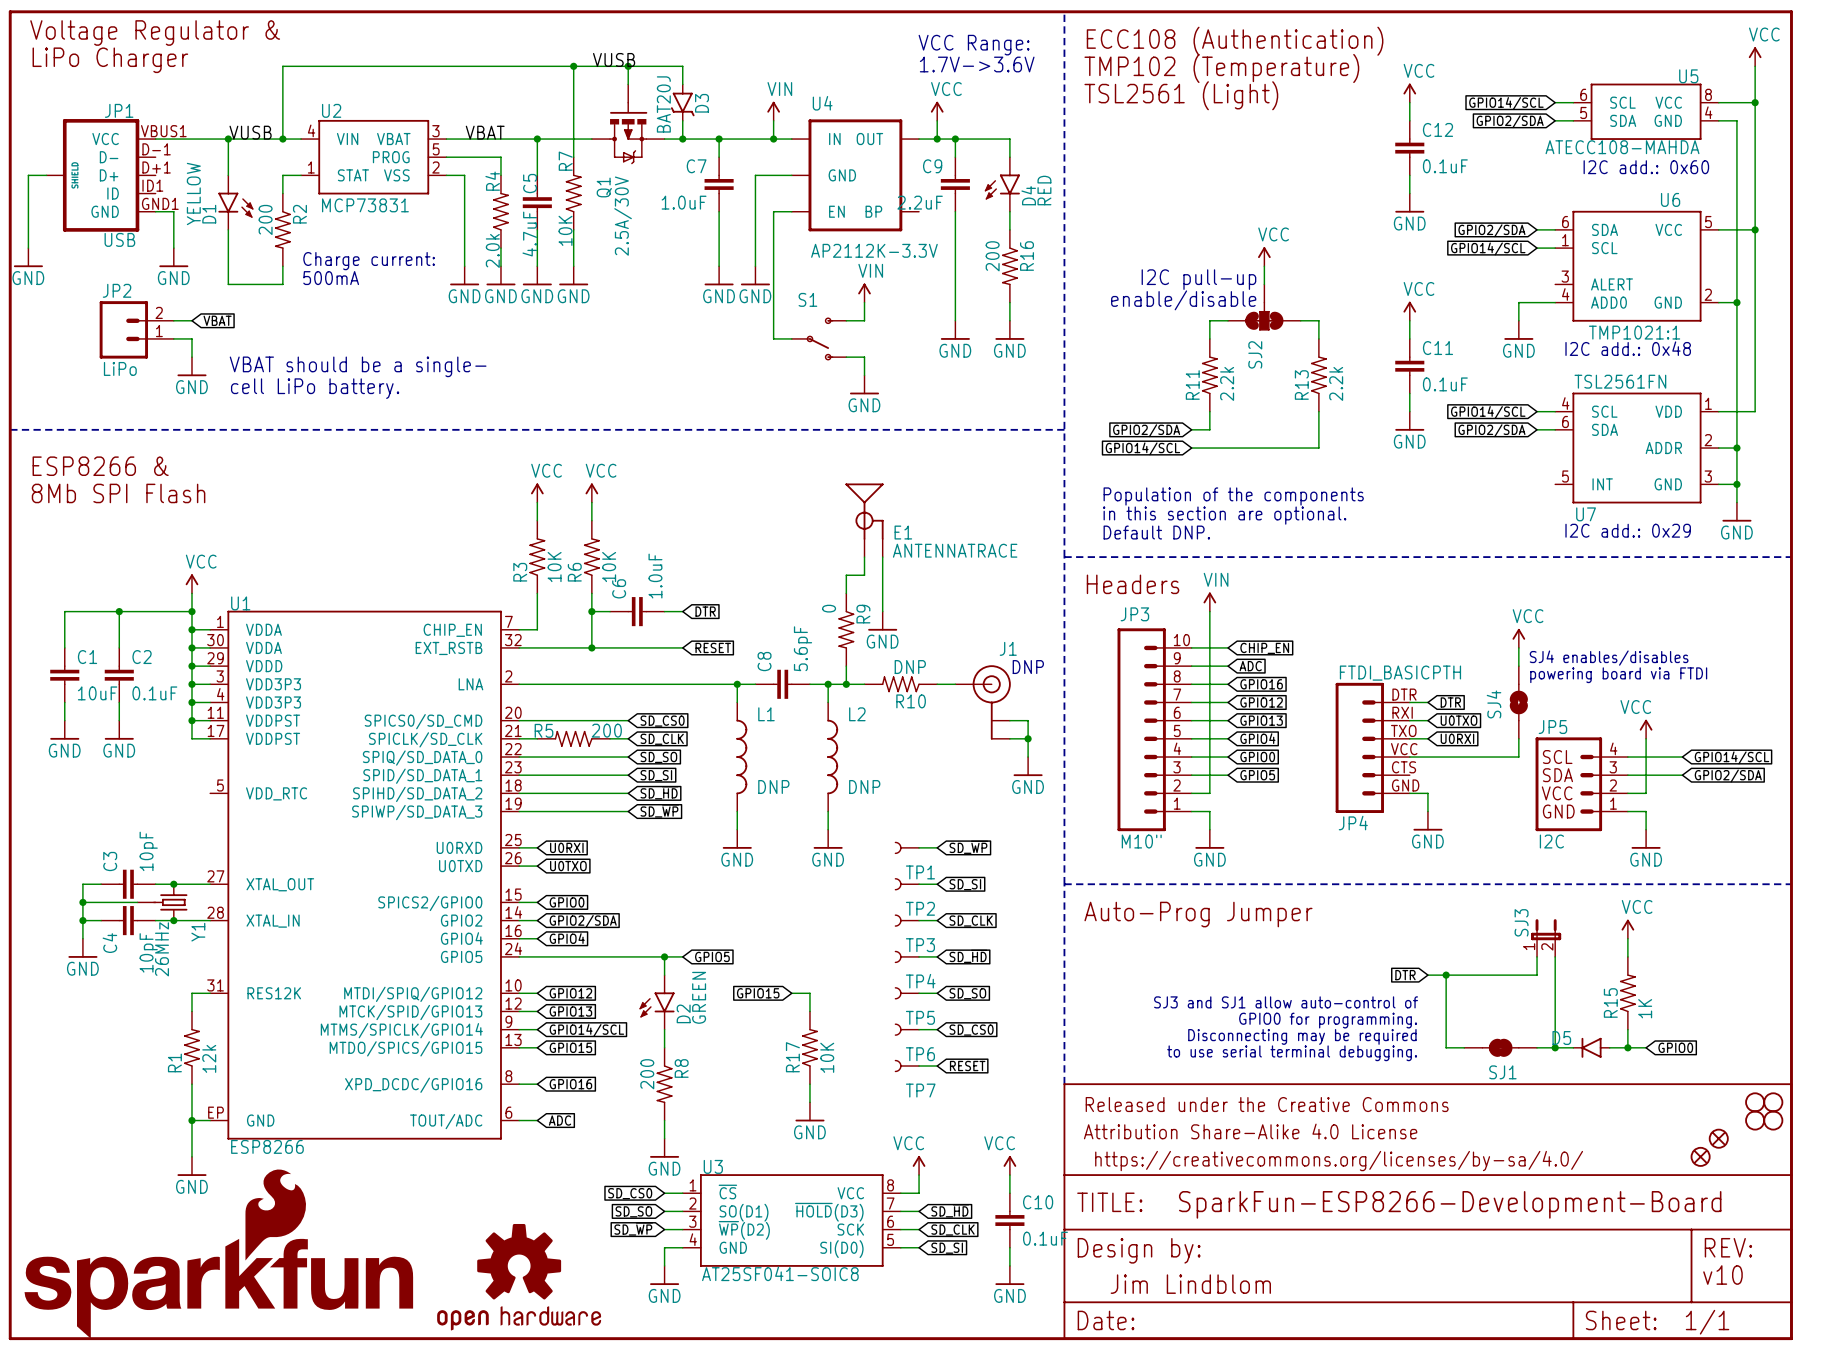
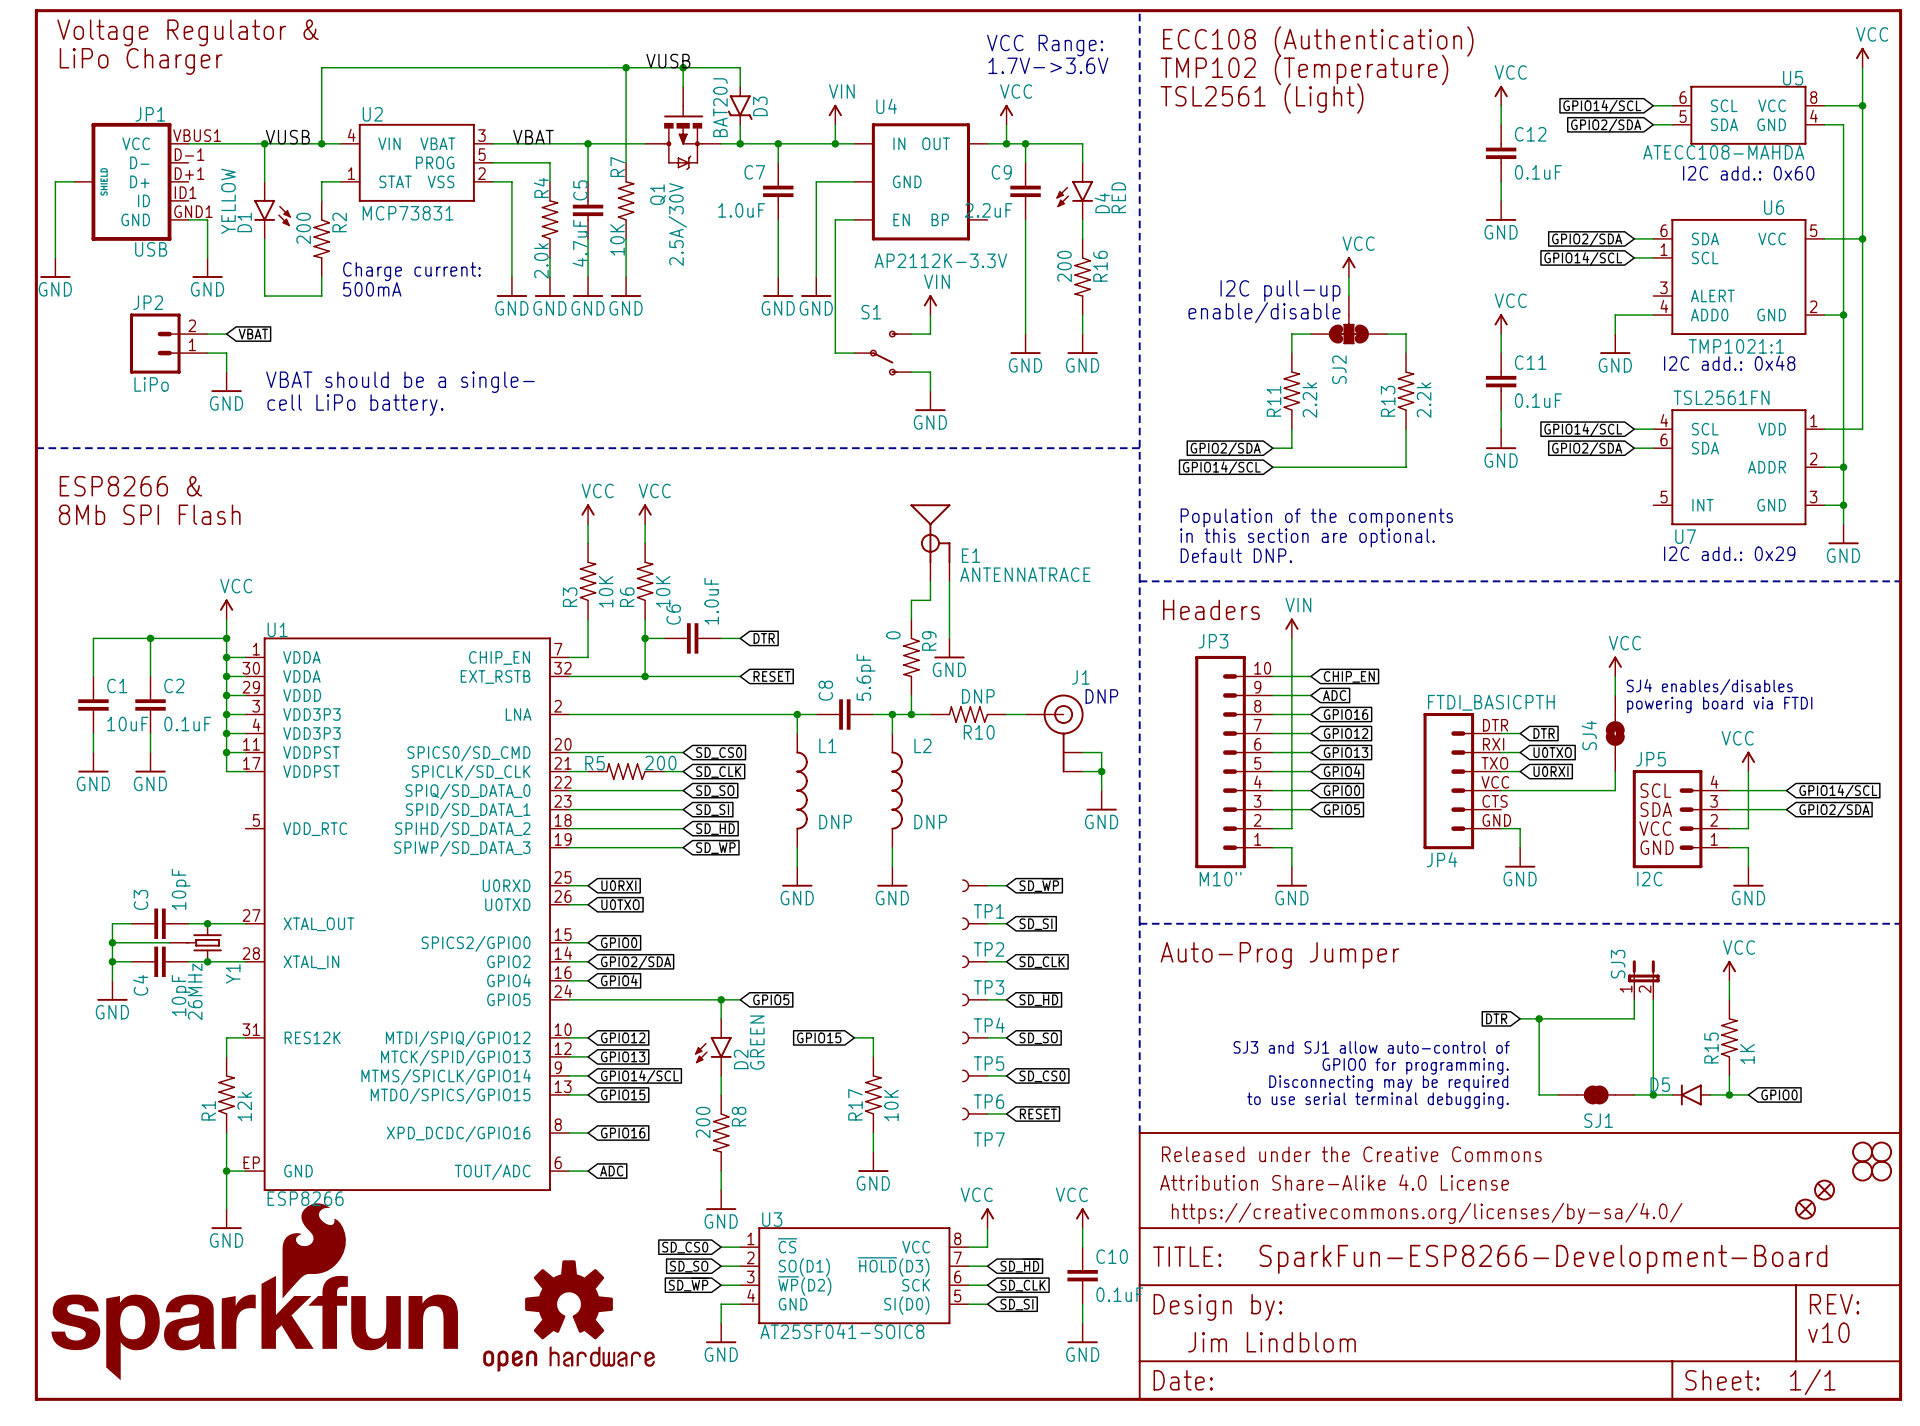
part position: (275, 1215) -> (314, 1250)
part position: (519, 1277) -> (568, 1316)
part position: (218, 1288) -> (254, 1328)

